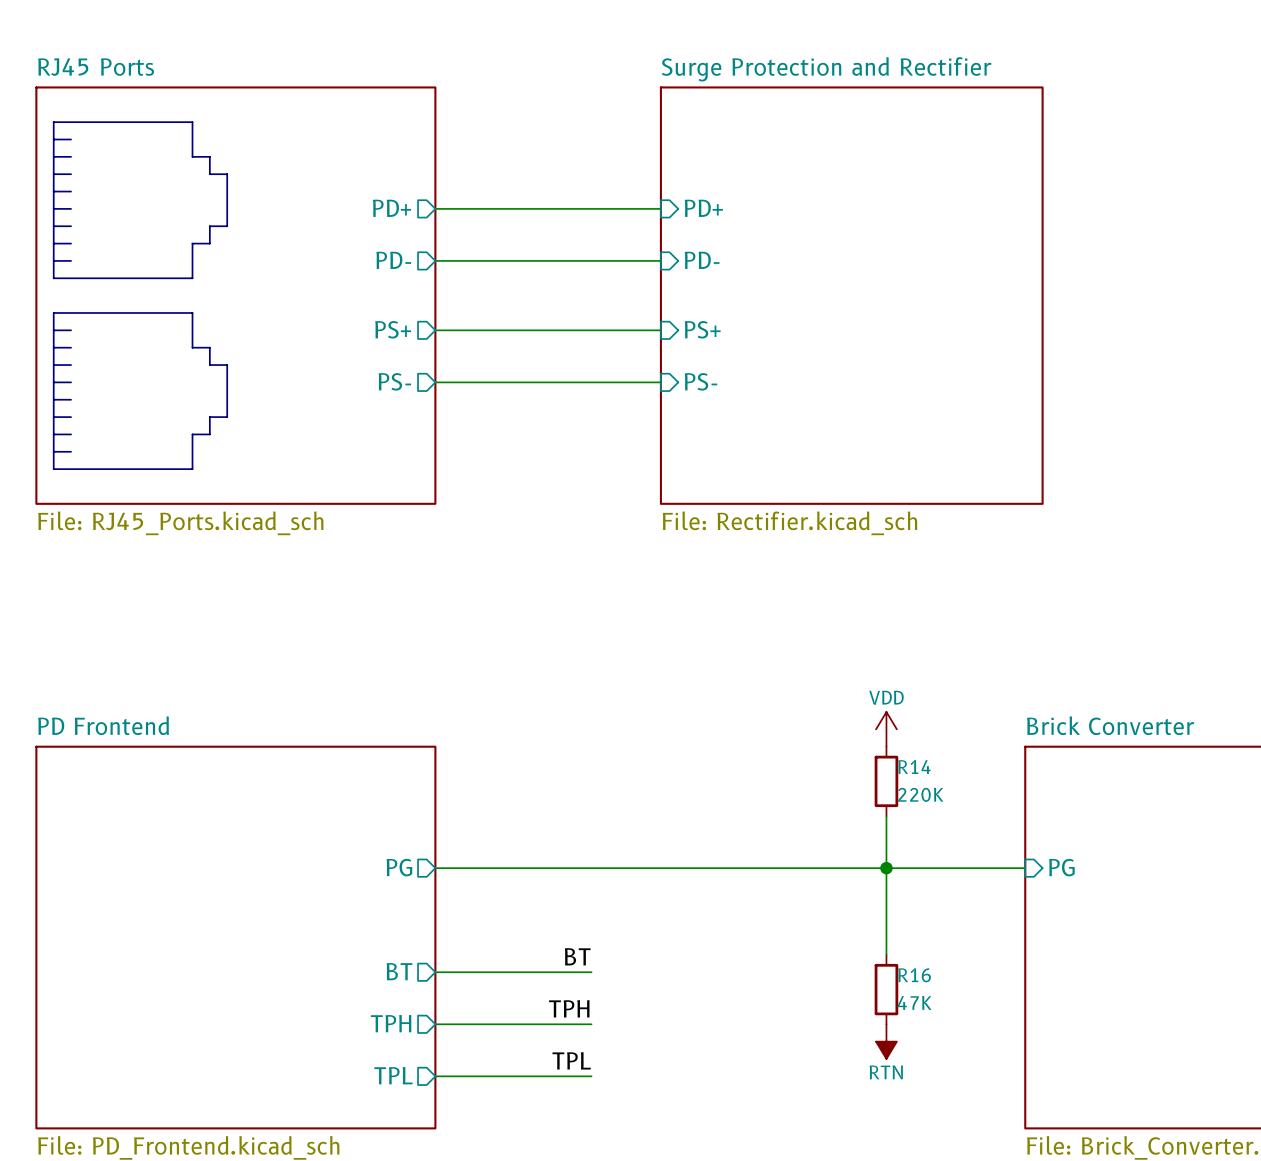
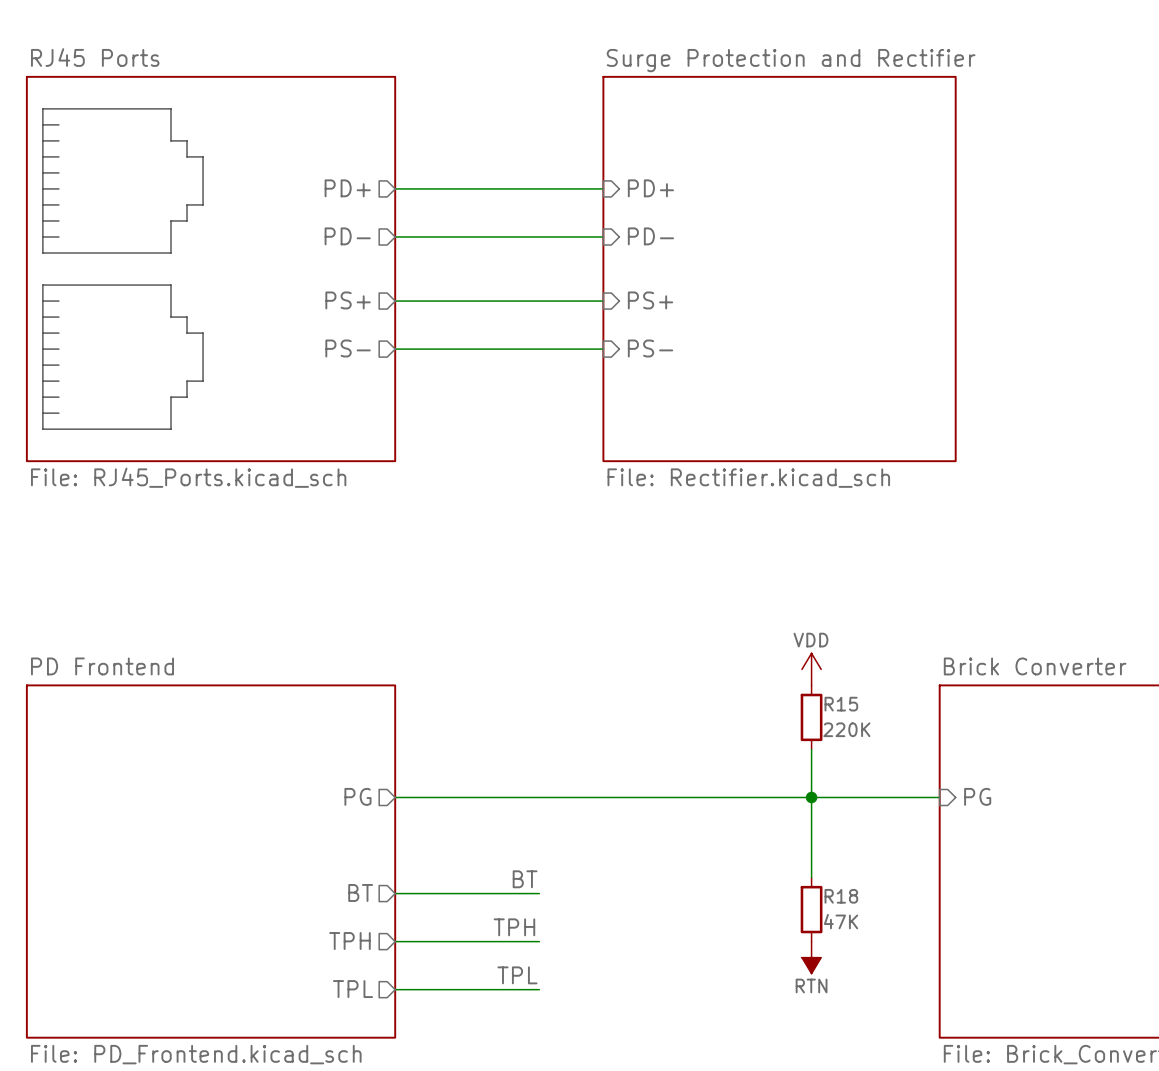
R14 name: R14 (914, 767) -> R15 (841, 704)
R16 name: R16 (914, 975) -> R18 (841, 896)

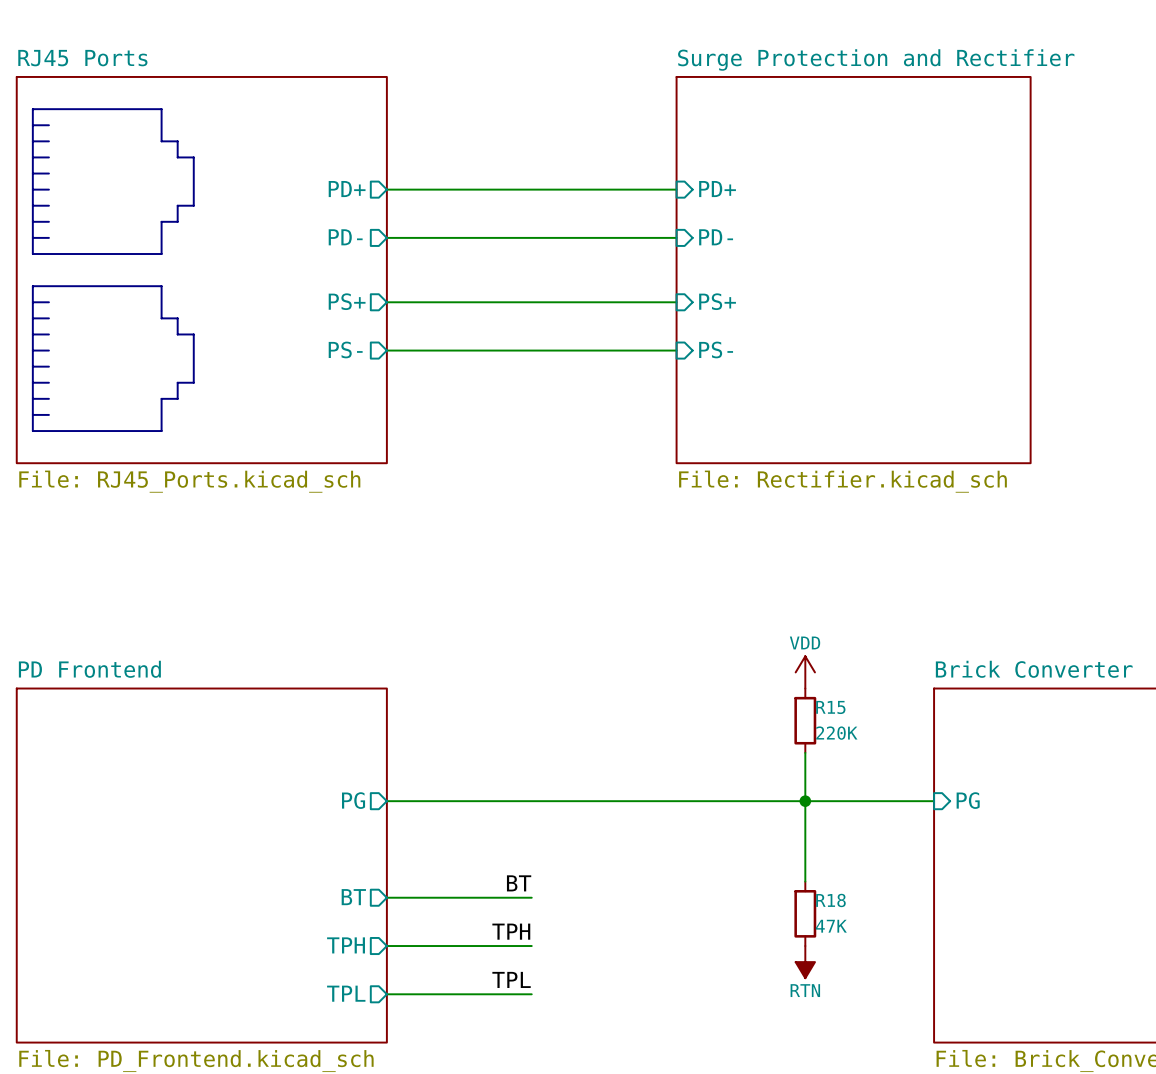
wire: none -> (596, 189) (676, 189)
sheet pin position: PD+ (650, 188) -> PD+ (717, 189)
wire: none -> (596, 237) (676, 237)
sheet pin position: PD- (650, 236) -> PD- (716, 237)
sheet Surge Protection and Rectifier position: (779, 269) -> (853, 270)
sheet pin position: PS+ (650, 300) -> PS+ (717, 301)
wire: none -> (596, 302) (676, 302)
sheet pin position: PS- (650, 348) -> PS- (716, 349)
wire: none -> (596, 350) (676, 350)

